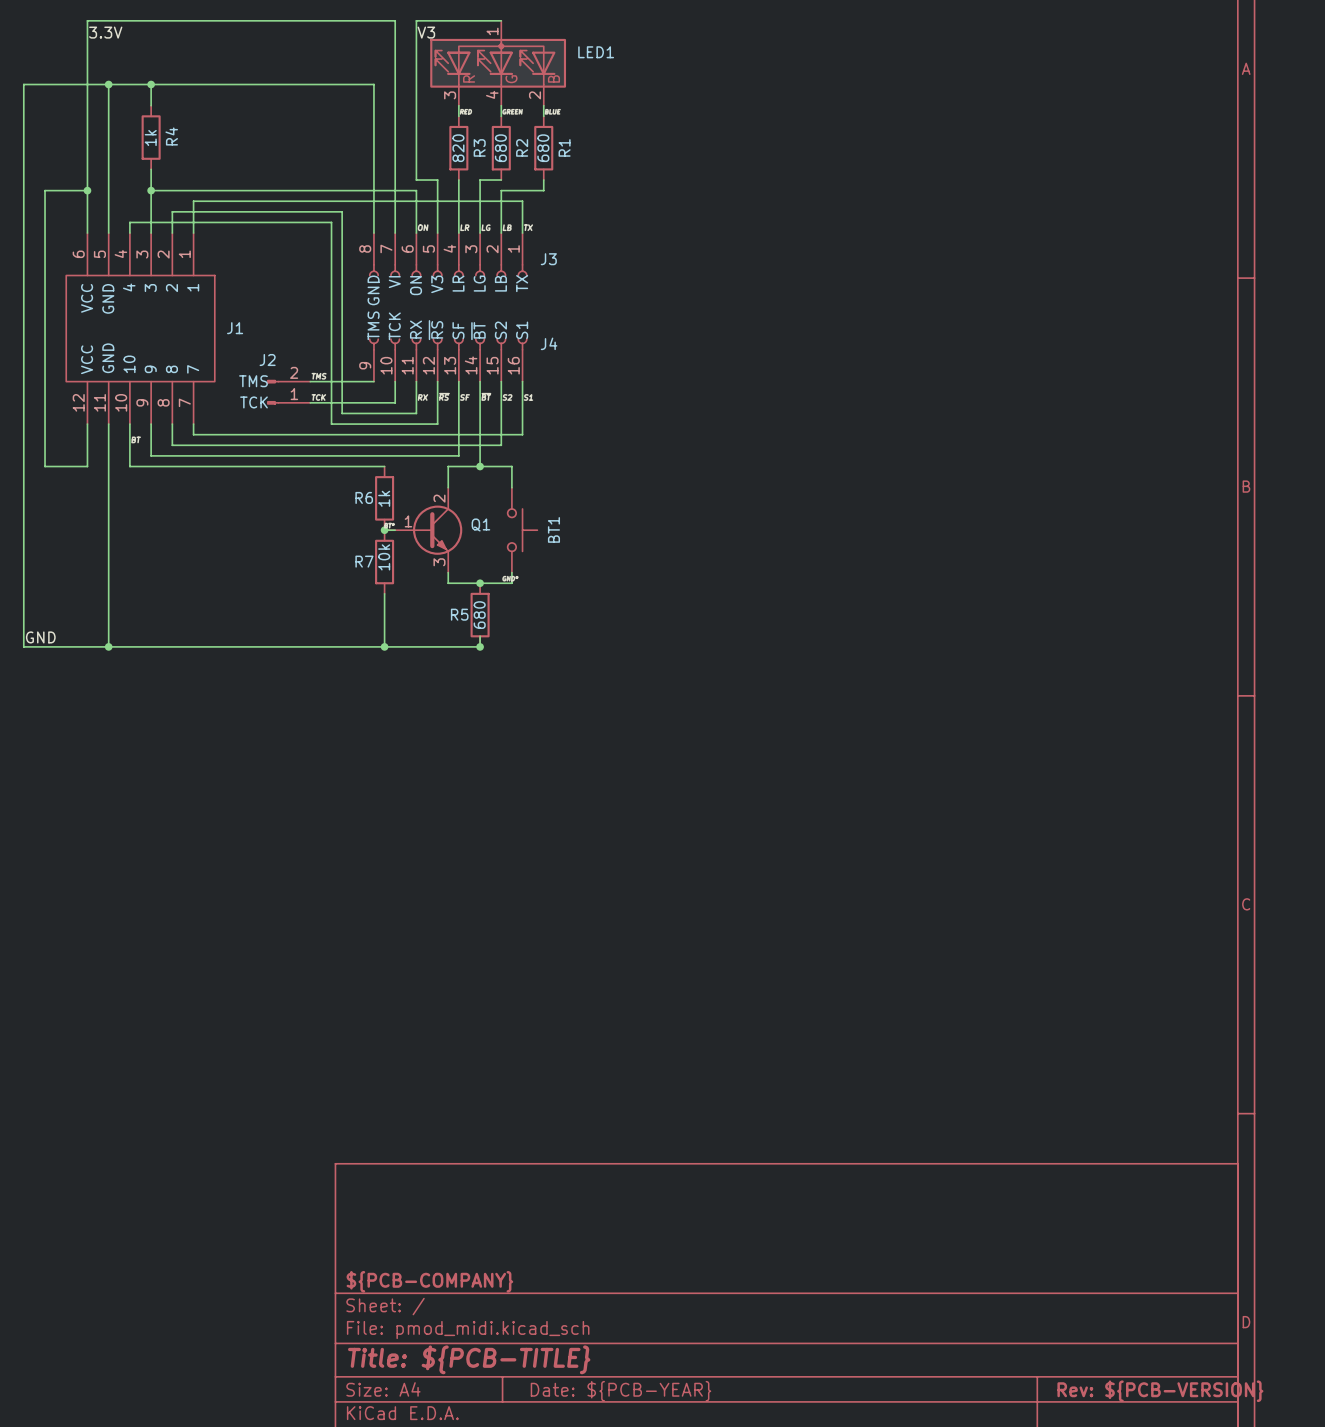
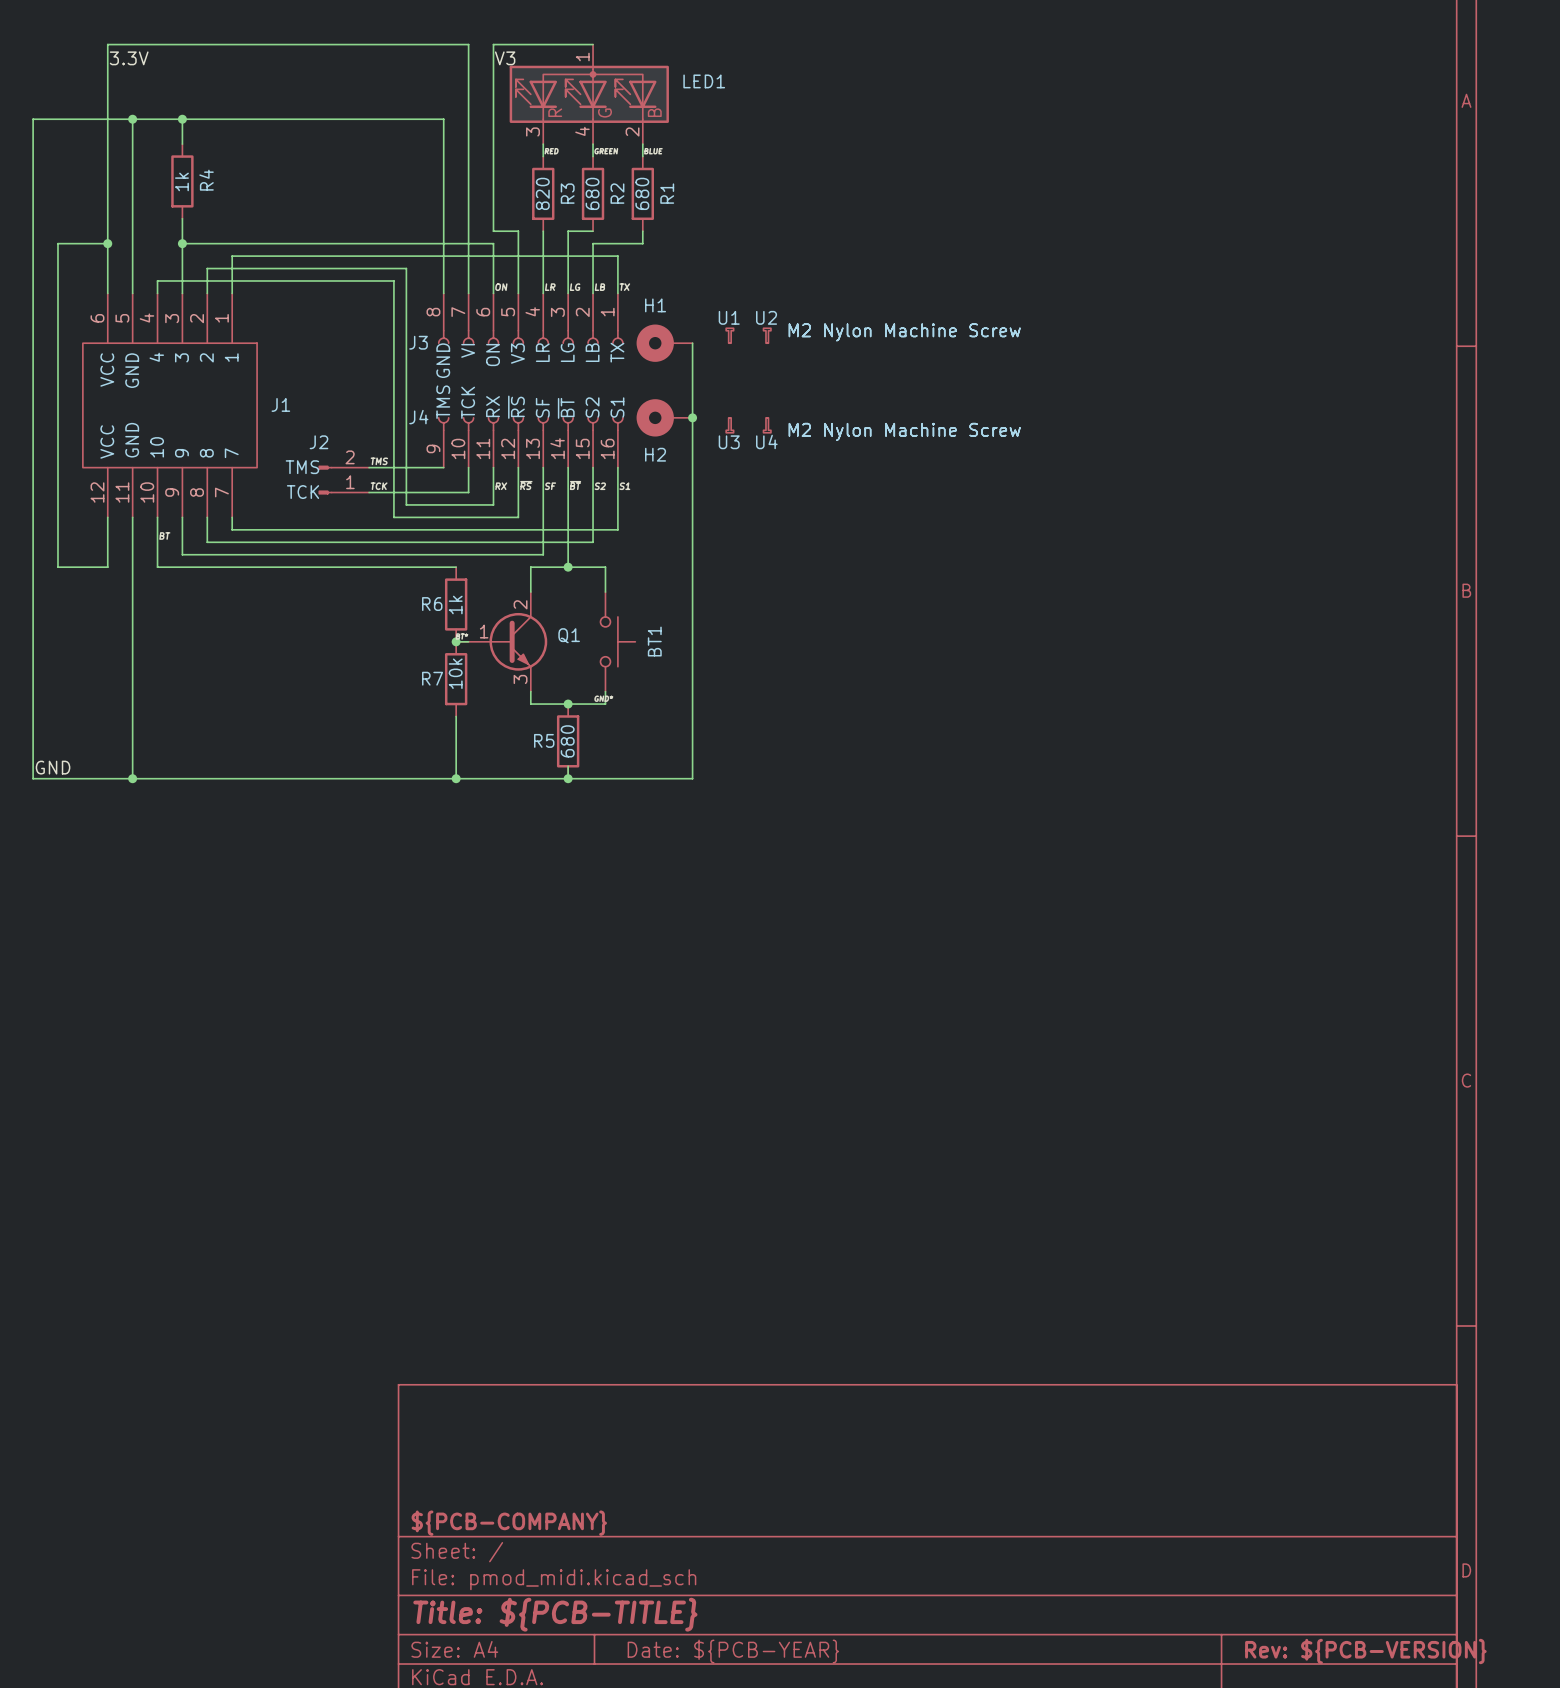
J3 name position: J3 (548, 259) -> J3 (418, 342)
U1: none -> M2 Nylon Machine Screw (729, 335)
U2: none -> M2 Nylon Machine Screw (767, 335)
H1: none -> (664, 343)
wire: none -> (692, 343) (692, 778) (568, 778)
H2: none -> (664, 417)
junction: none -> (692, 417)
J4 name position: J4 (549, 343) -> J4 (418, 417)
U3: none -> M2 Nylon Machine Screw (729, 425)
U4: none -> M2 Nylon Machine Screw (767, 425)

